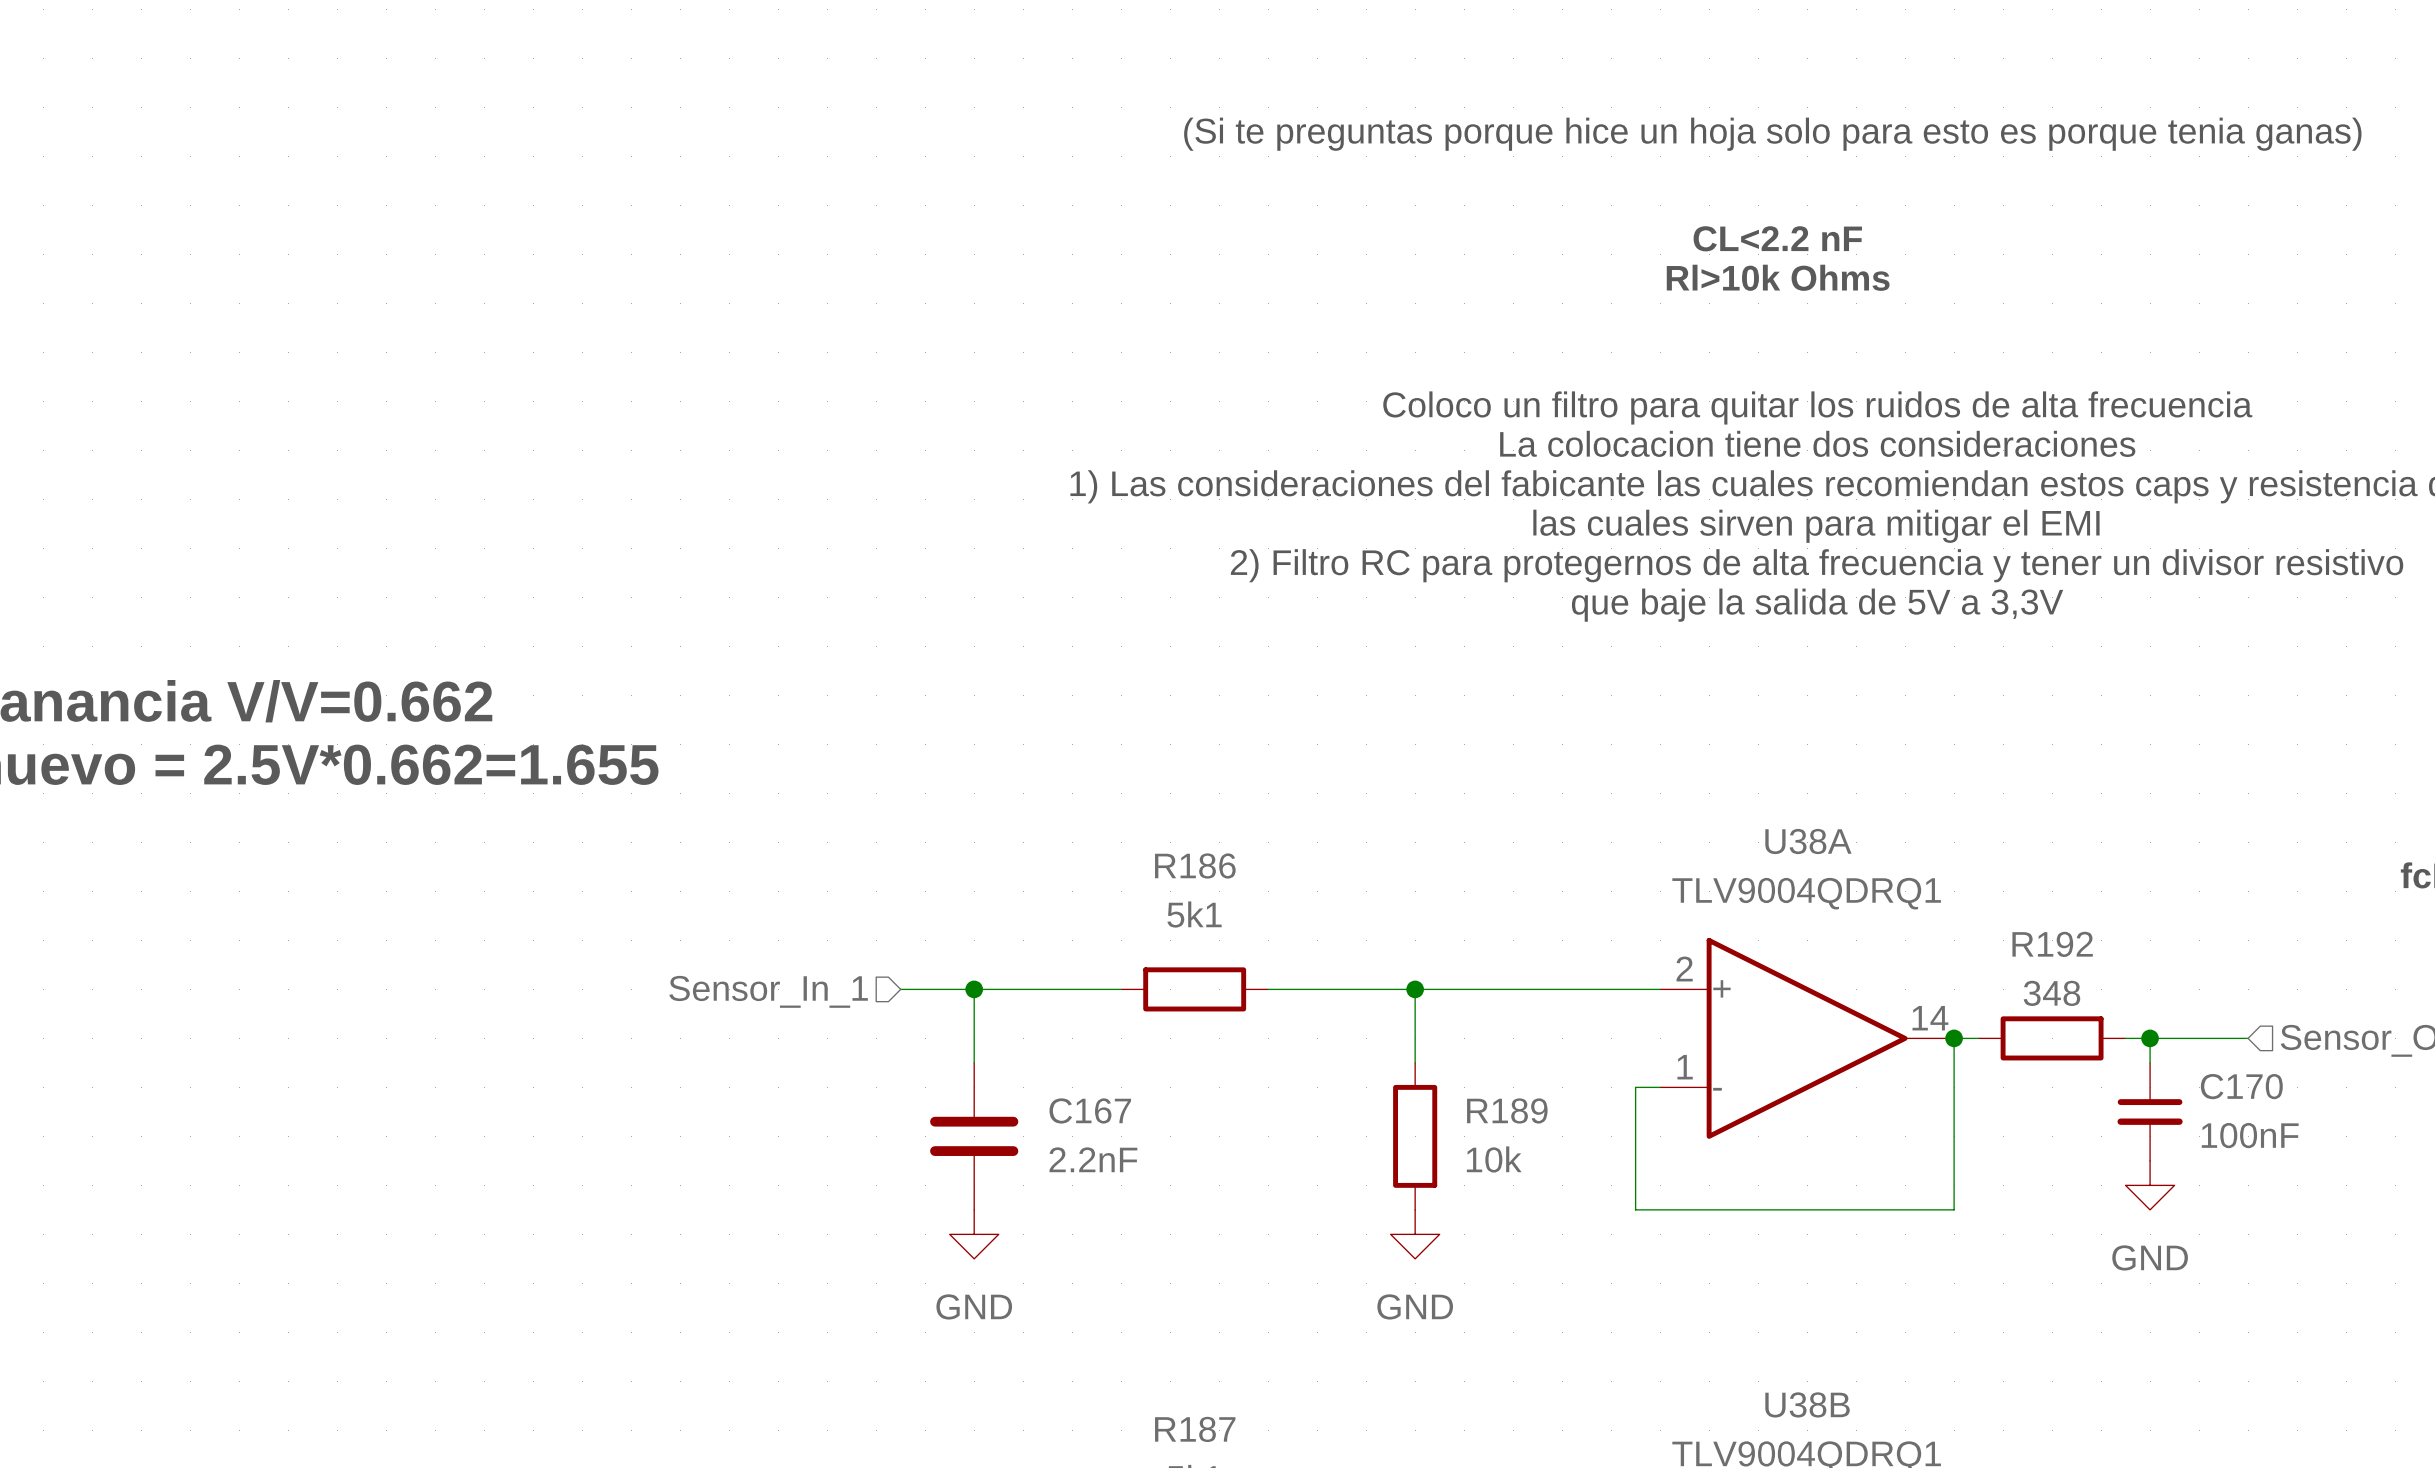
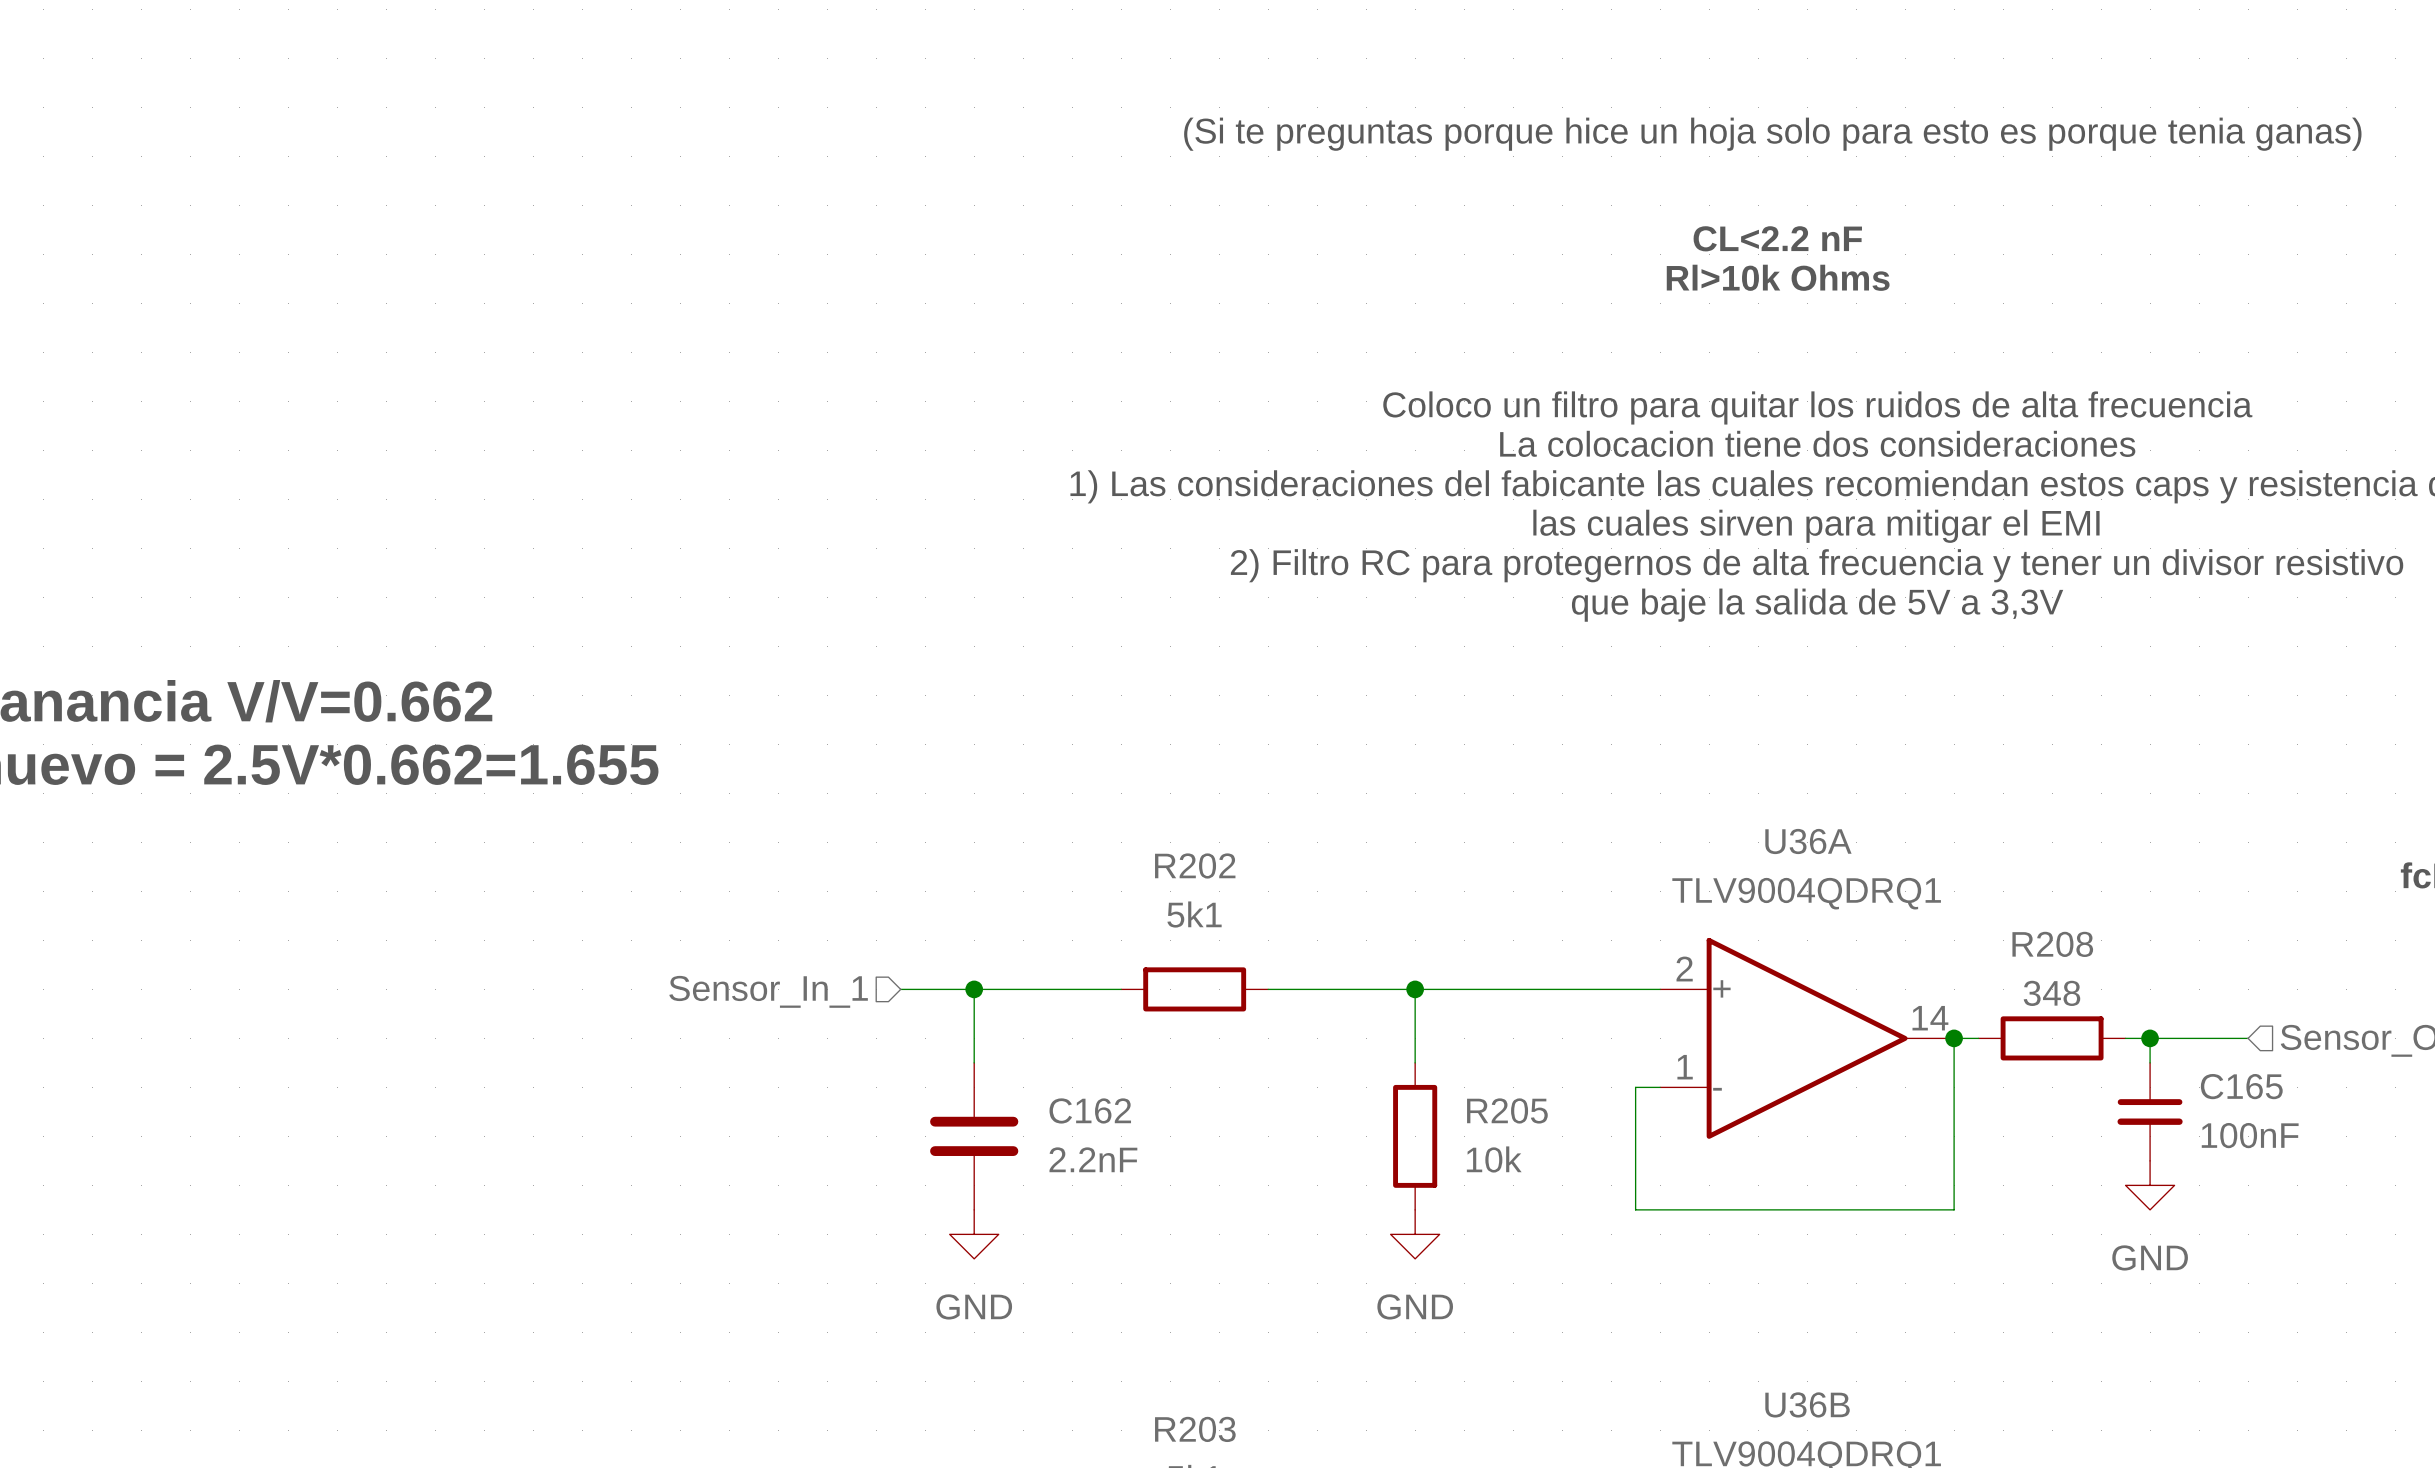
U38A name: U38A (1808, 841) -> U36A (1808, 841)
R186 name: R186 (1195, 865) -> R202 (1195, 865)
R192 name: R192 (2052, 944) -> R208 (2052, 944)
C170 name: C170 (2241, 1086) -> C165 (2241, 1086)
C167 name: C167 (1090, 1110) -> C162 (1090, 1110)
R189 name: R189 (1507, 1110) -> R205 (1507, 1110)
U38B name: U38B (1807, 1404) -> U36B (1807, 1404)
R187 name: R187 (1195, 1429) -> R203 (1195, 1429)

